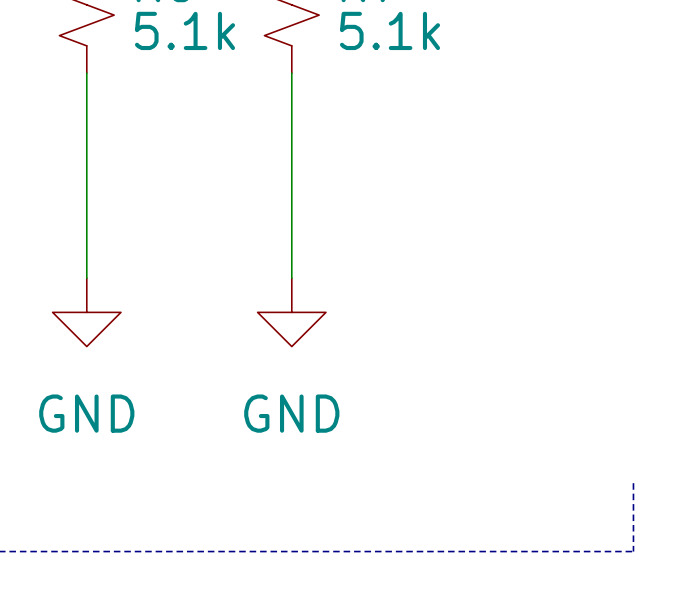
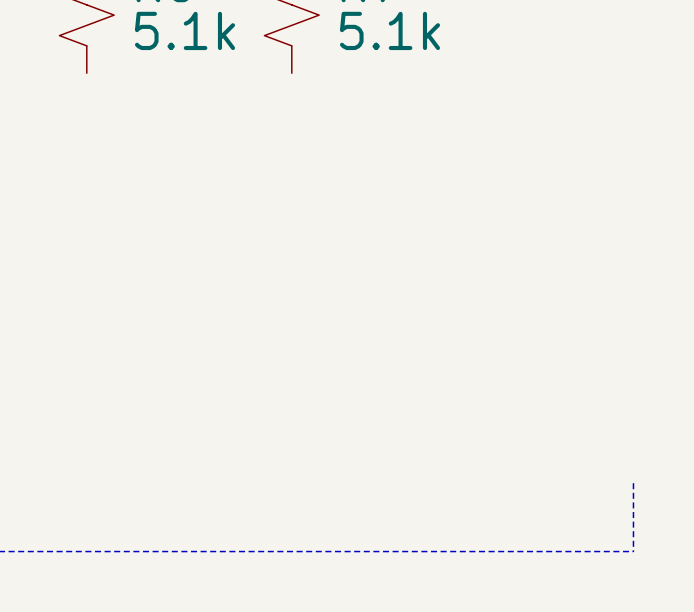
wire: (86, 73) (86, 278) -> none
wire: (291, 73) (291, 278) -> none
power symbol: GND (86, 312) -> none
power symbol: GND (291, 312) -> none

